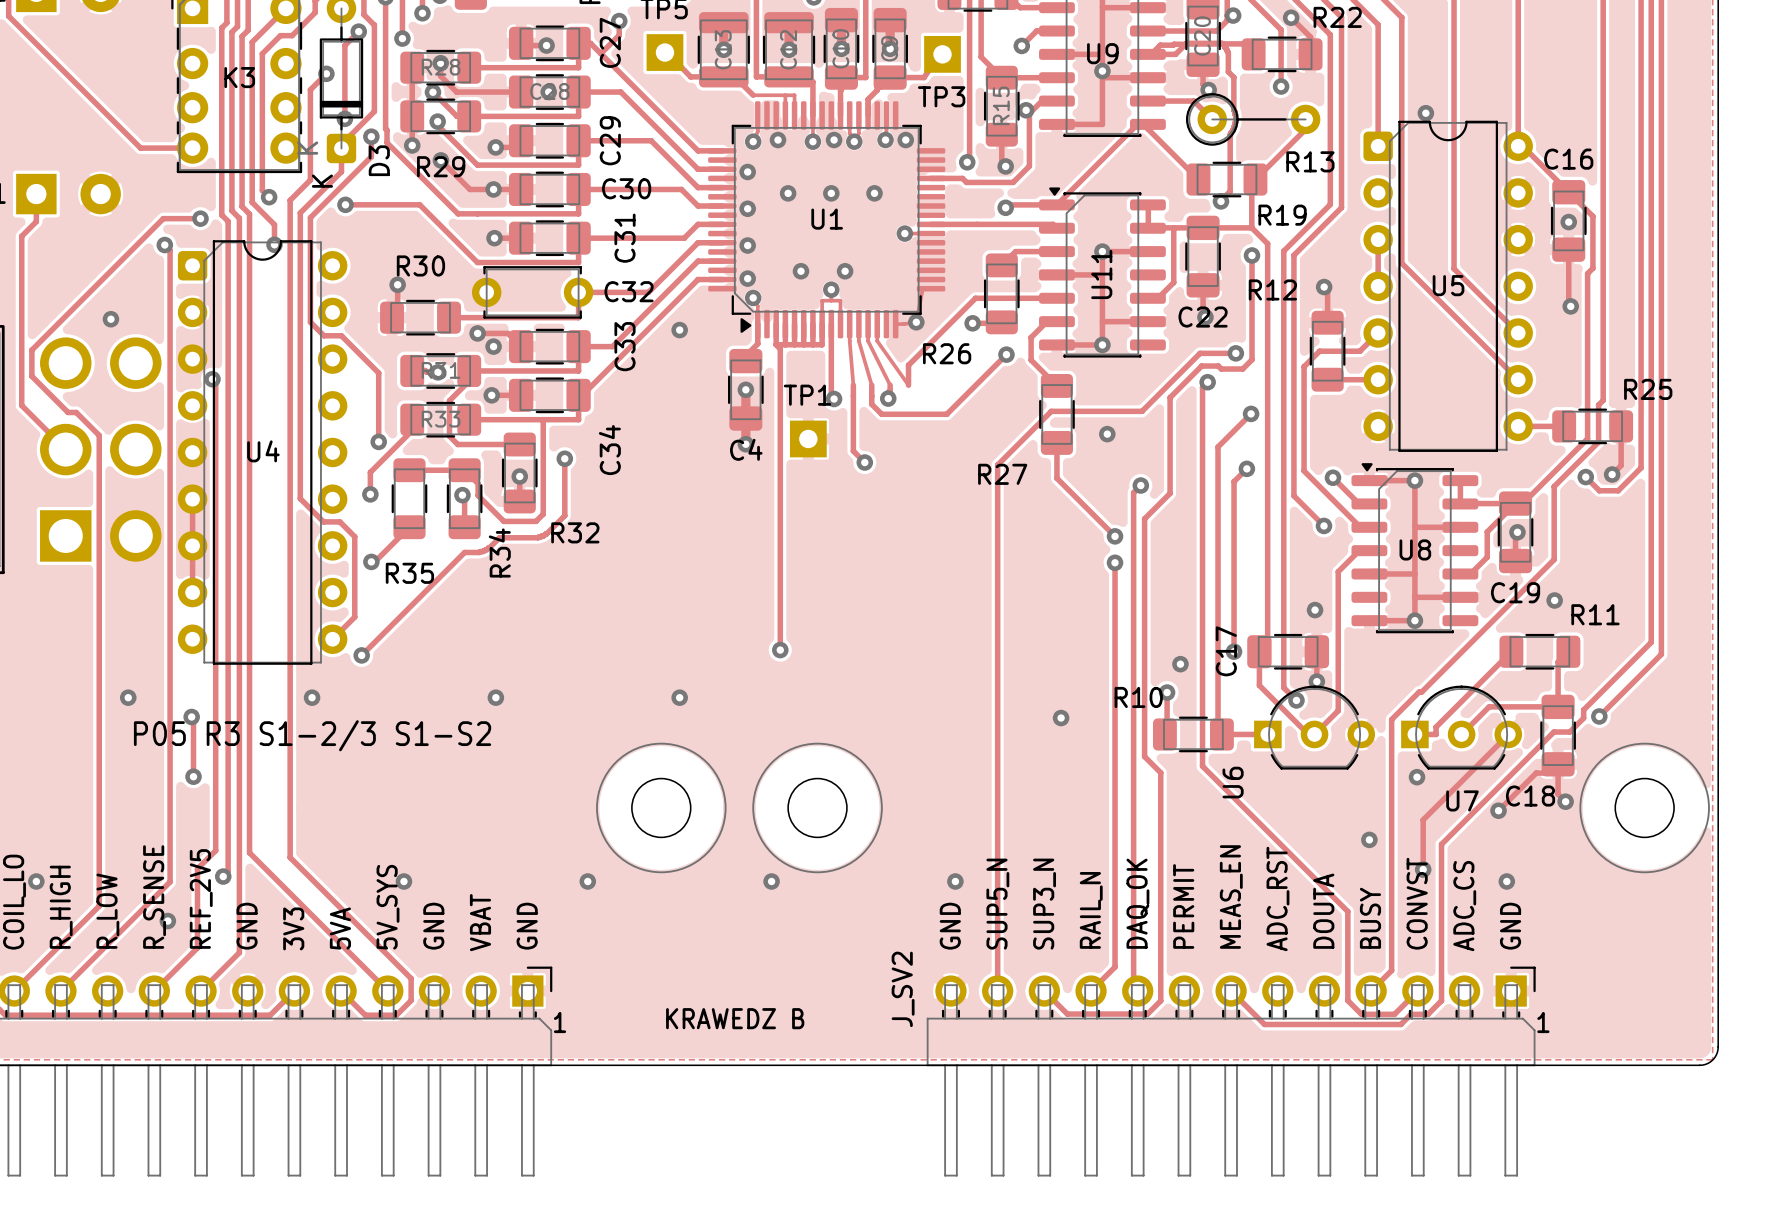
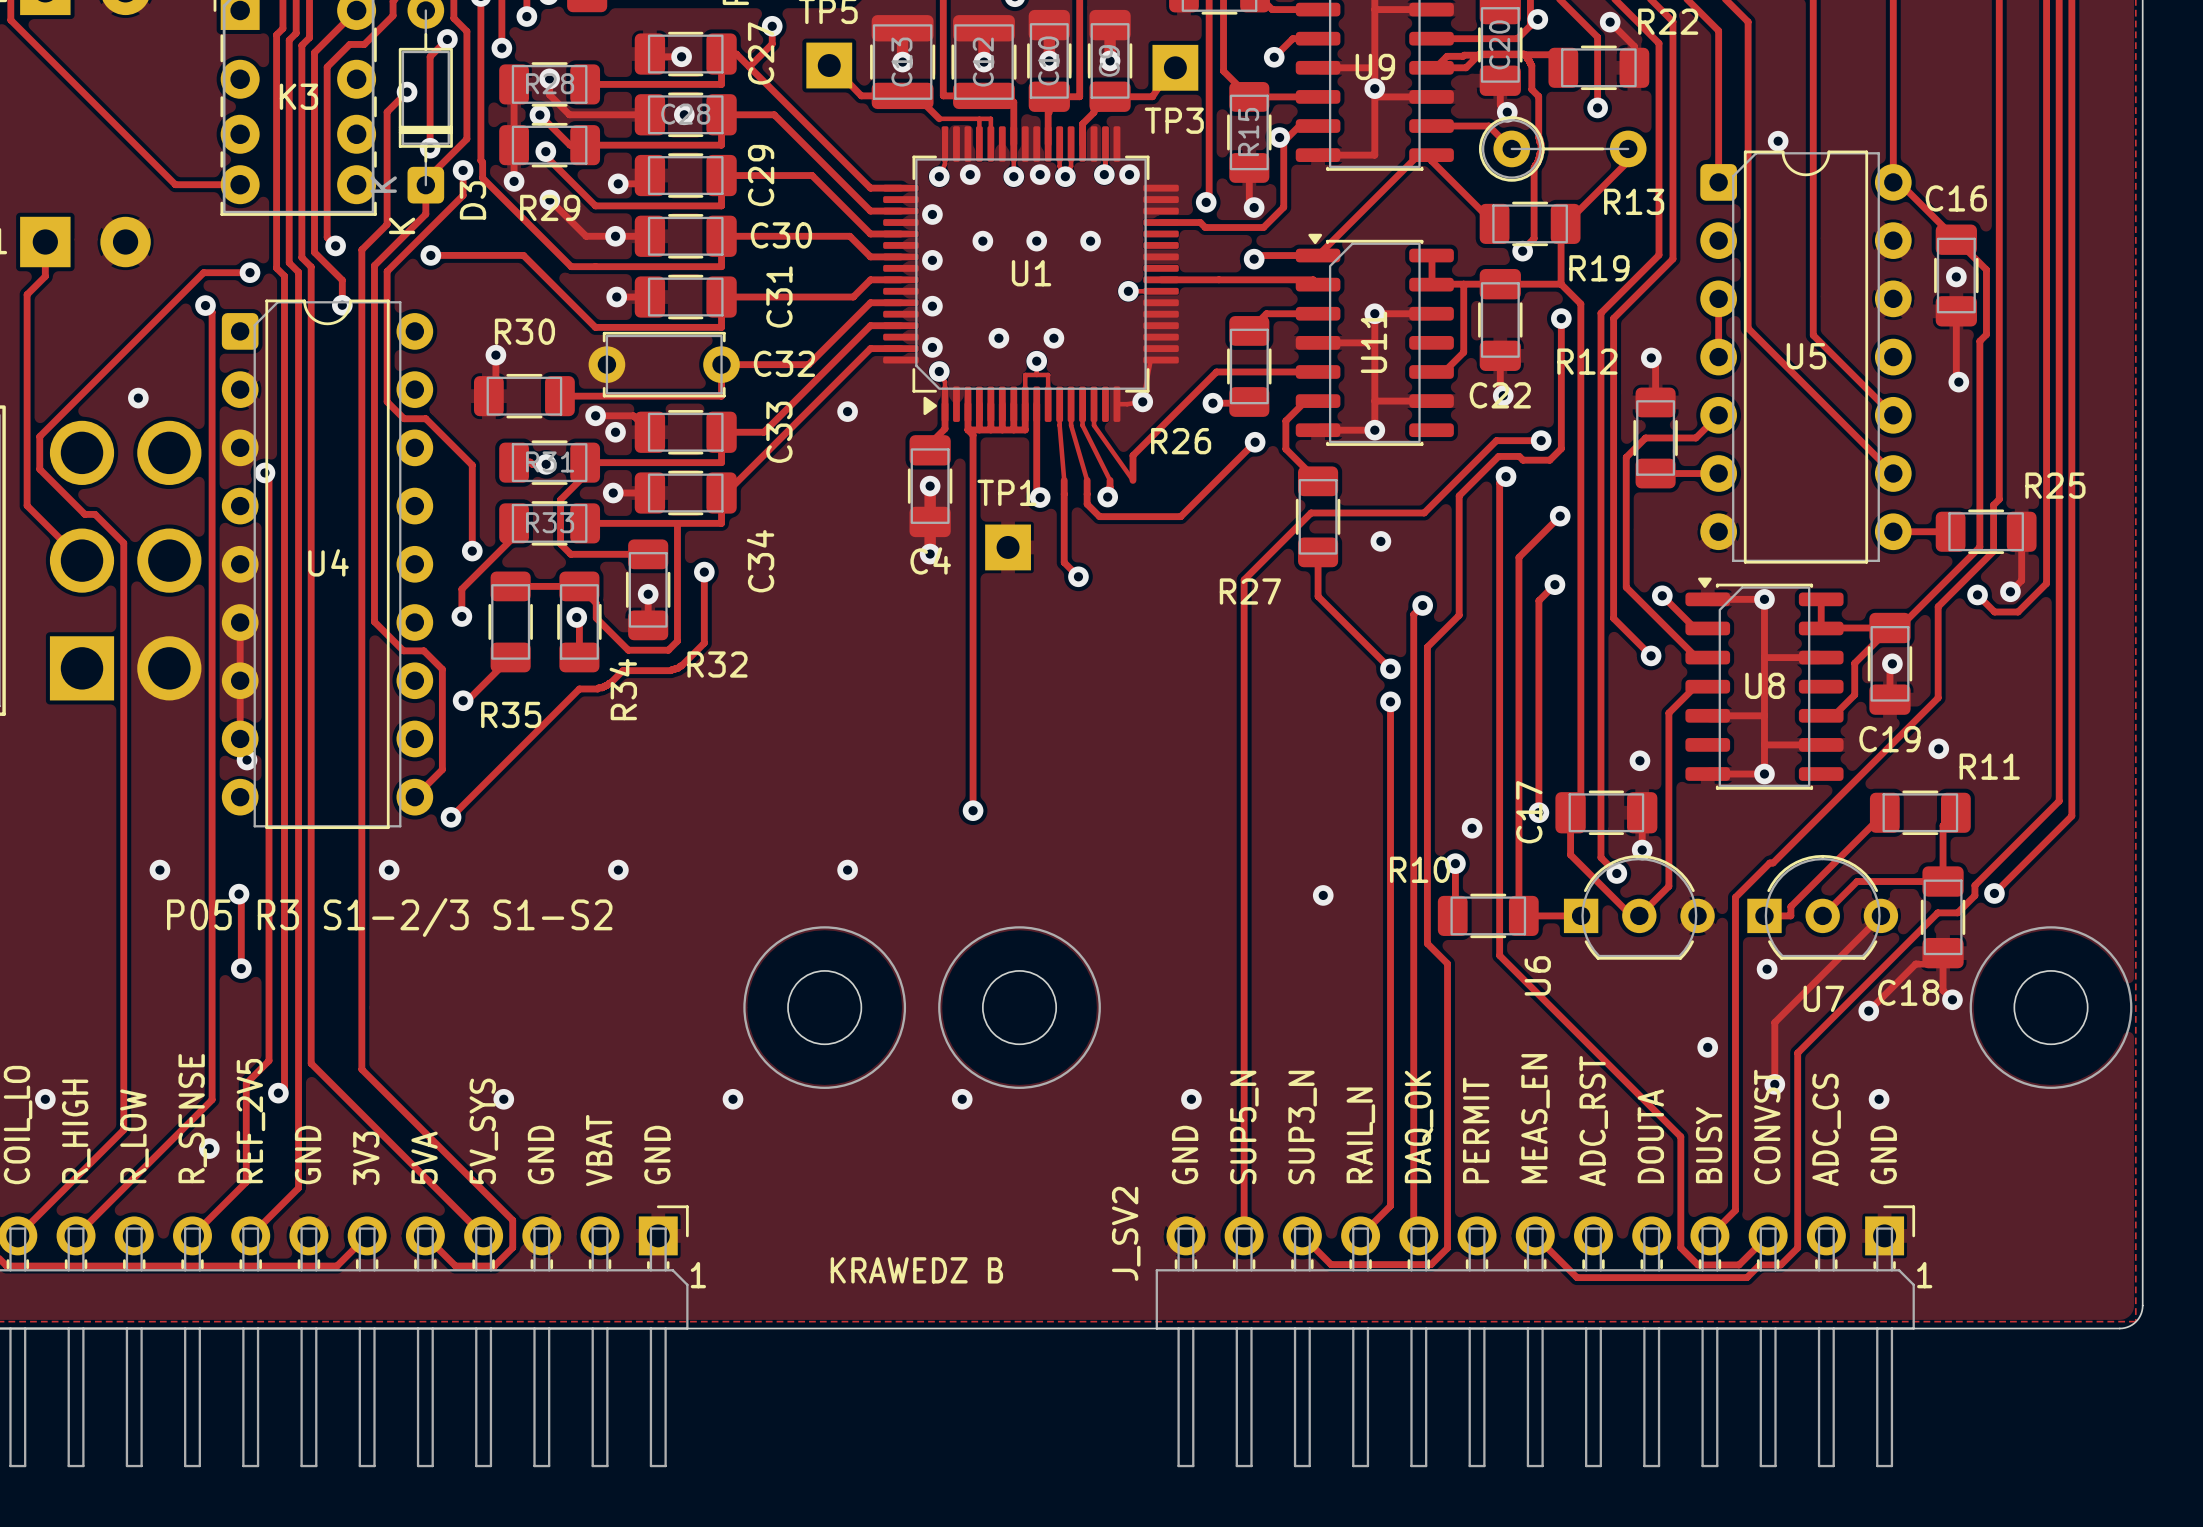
via: none -> (247, 760)

